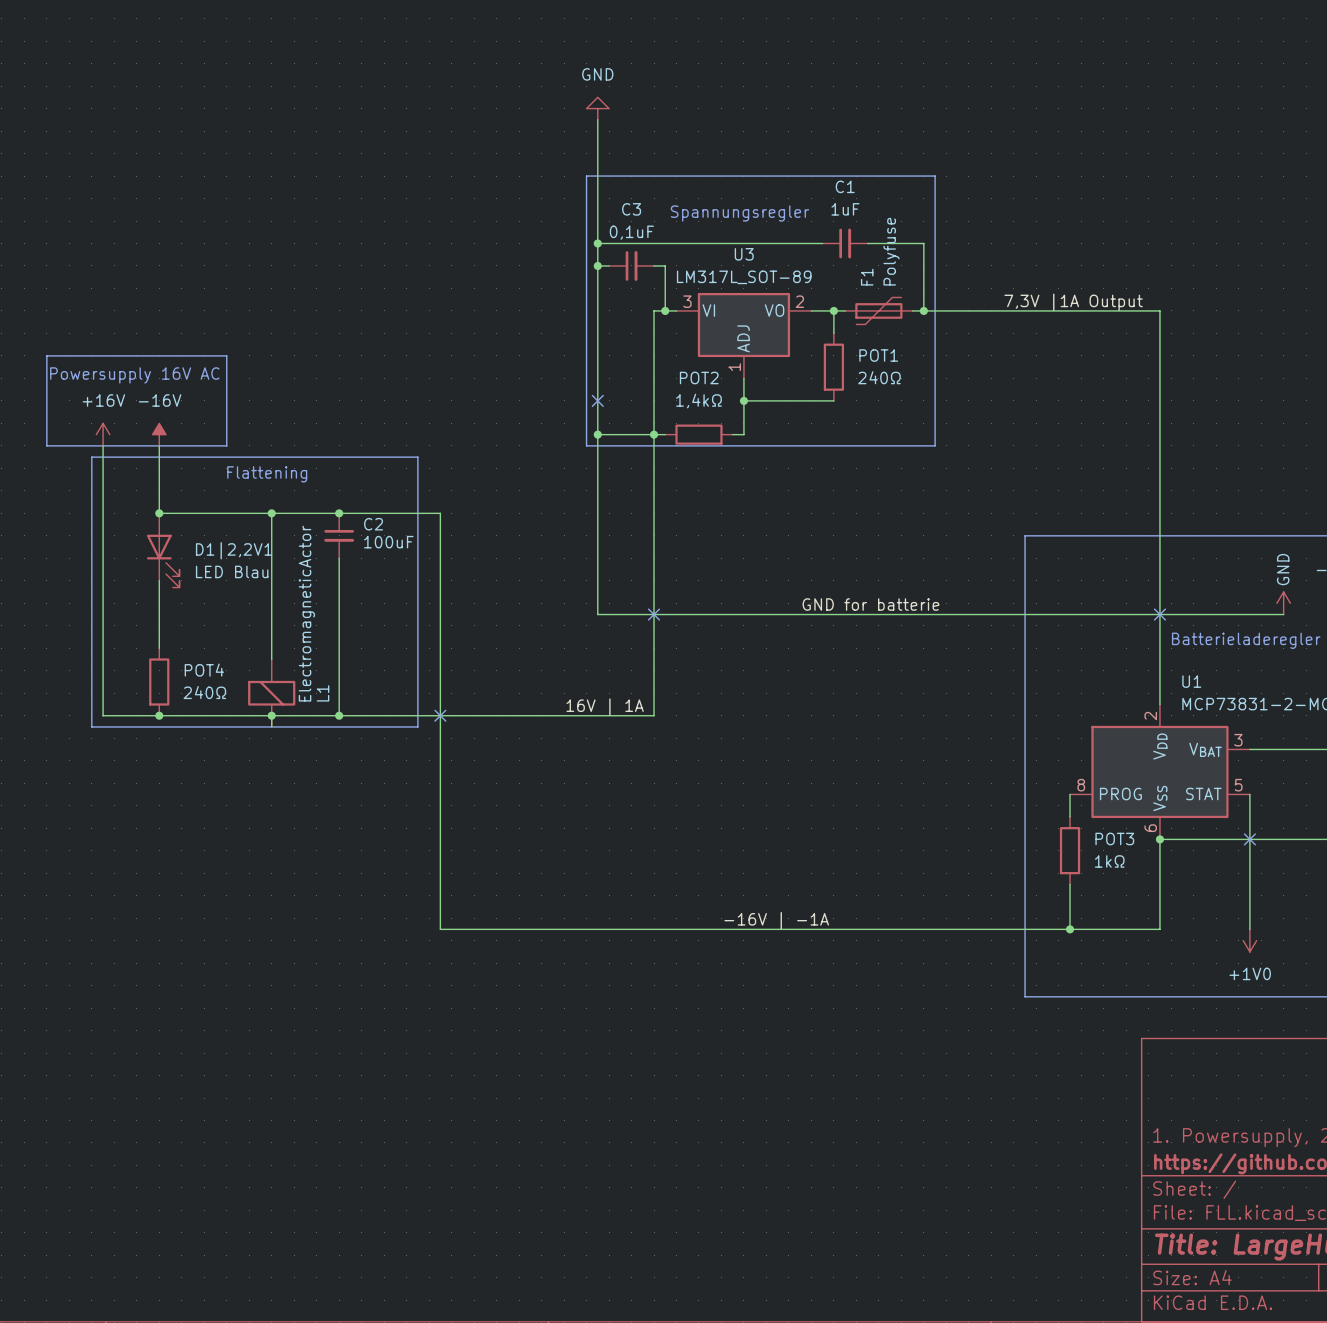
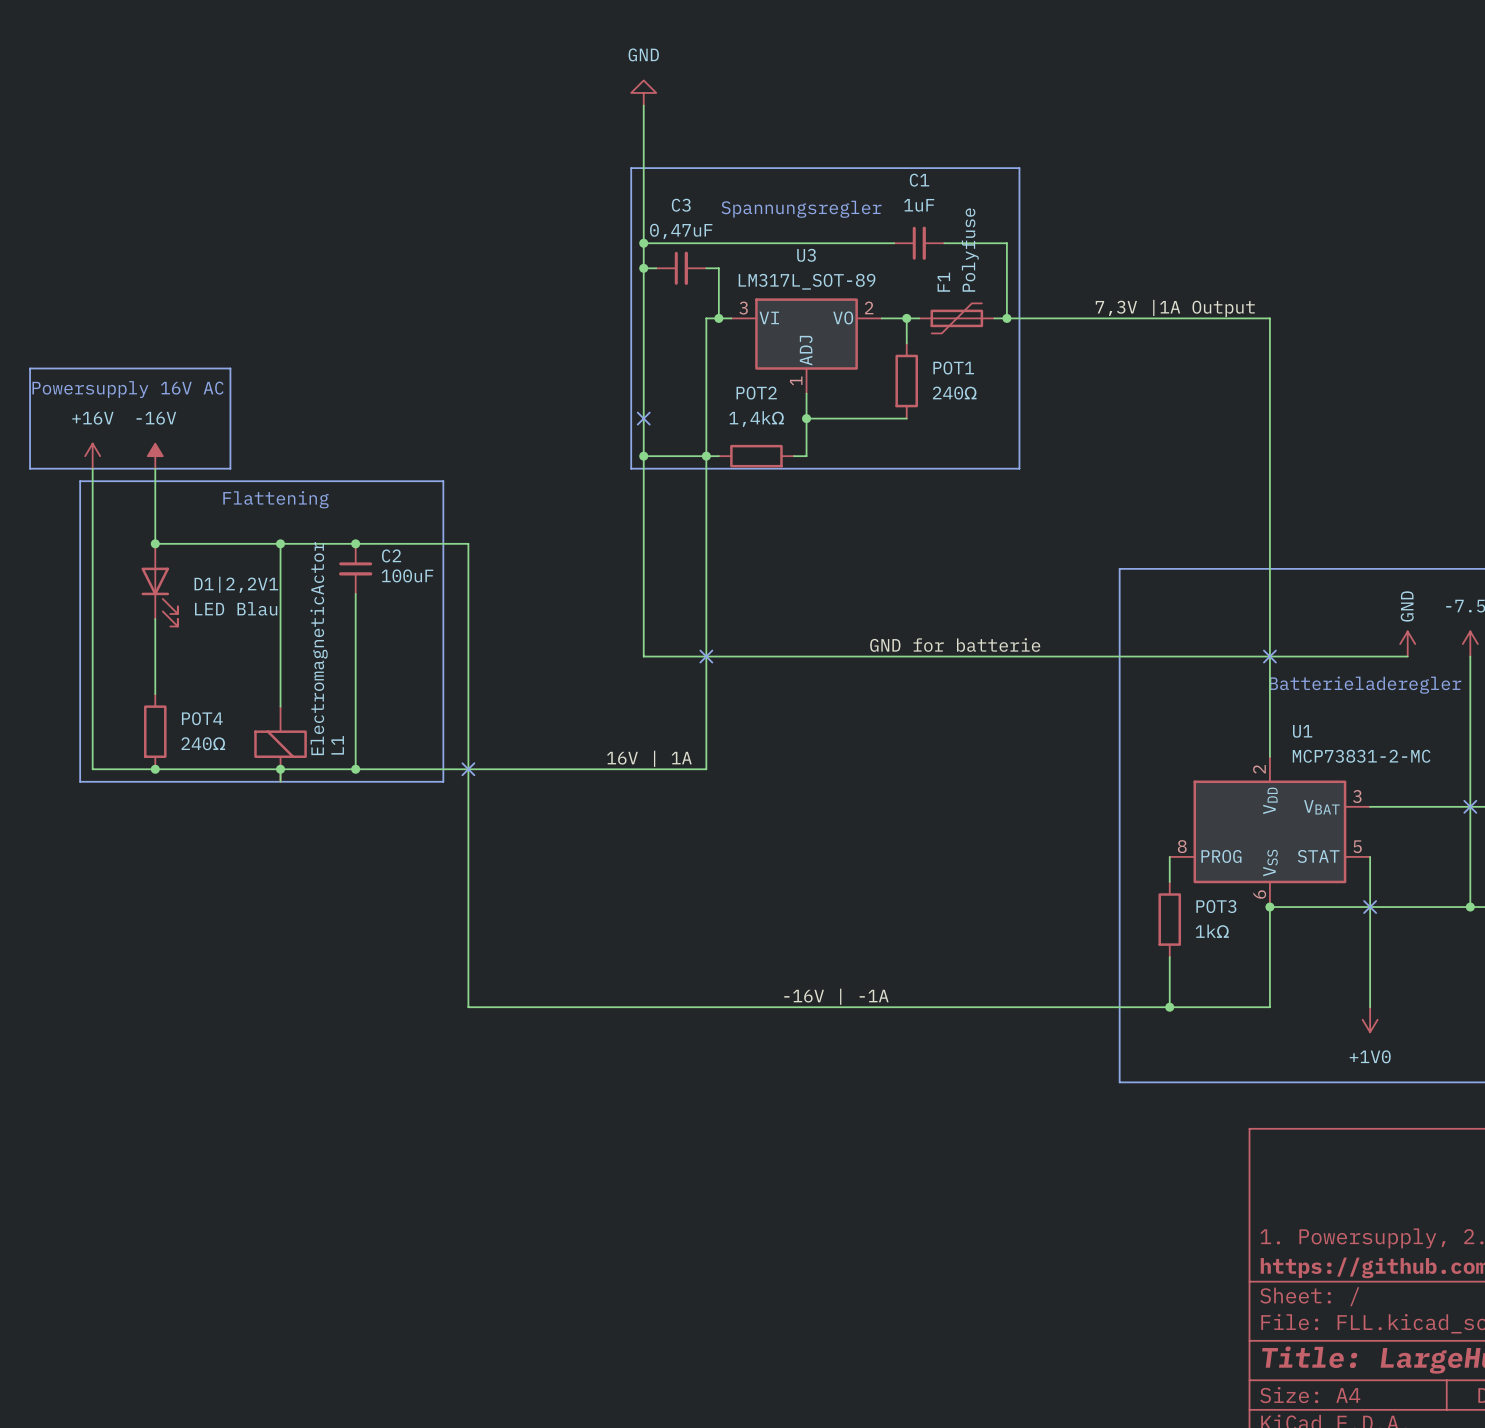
C3 value: 0,1uF (631, 232) -> 0,47uF (681, 231)

